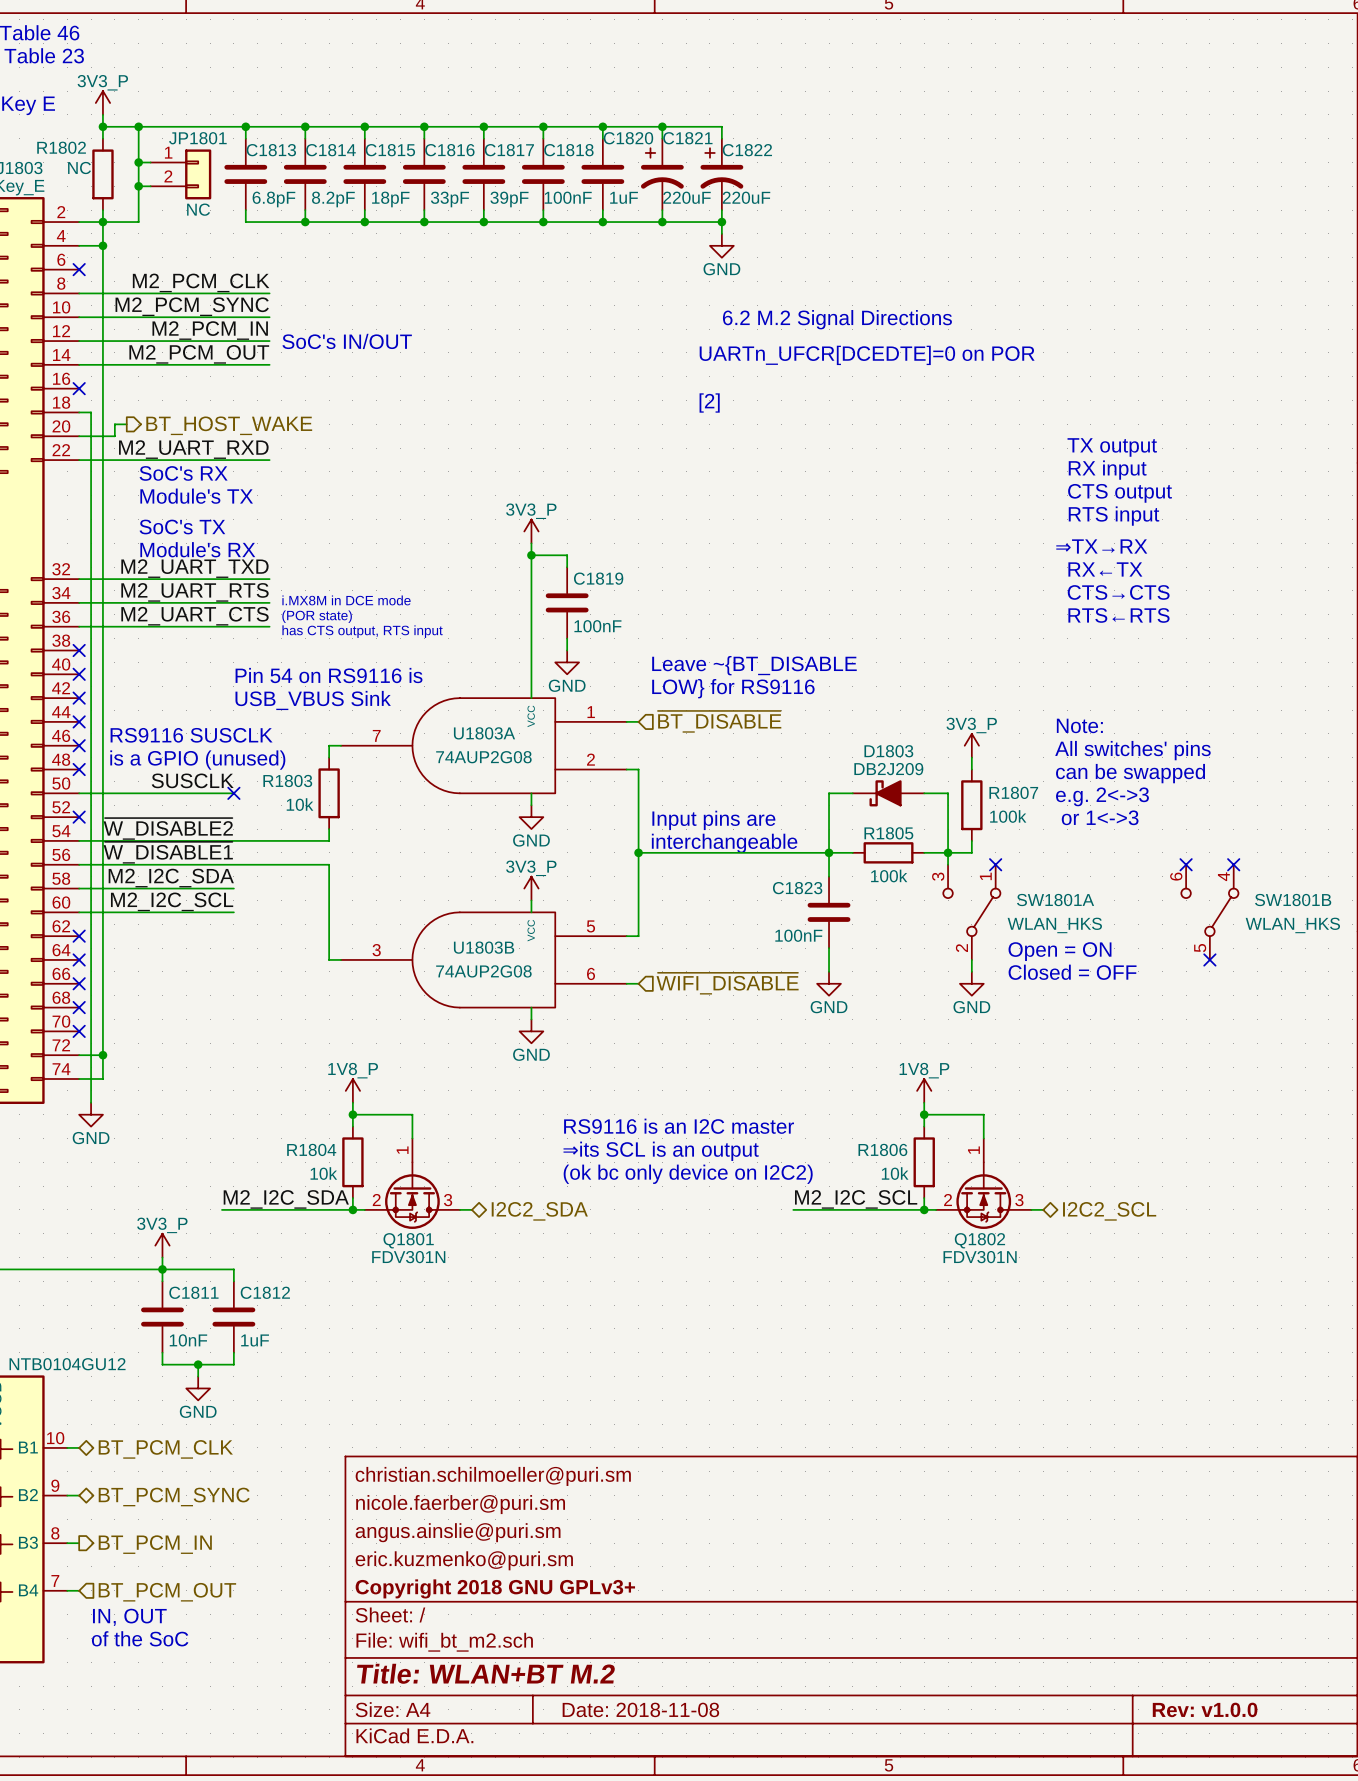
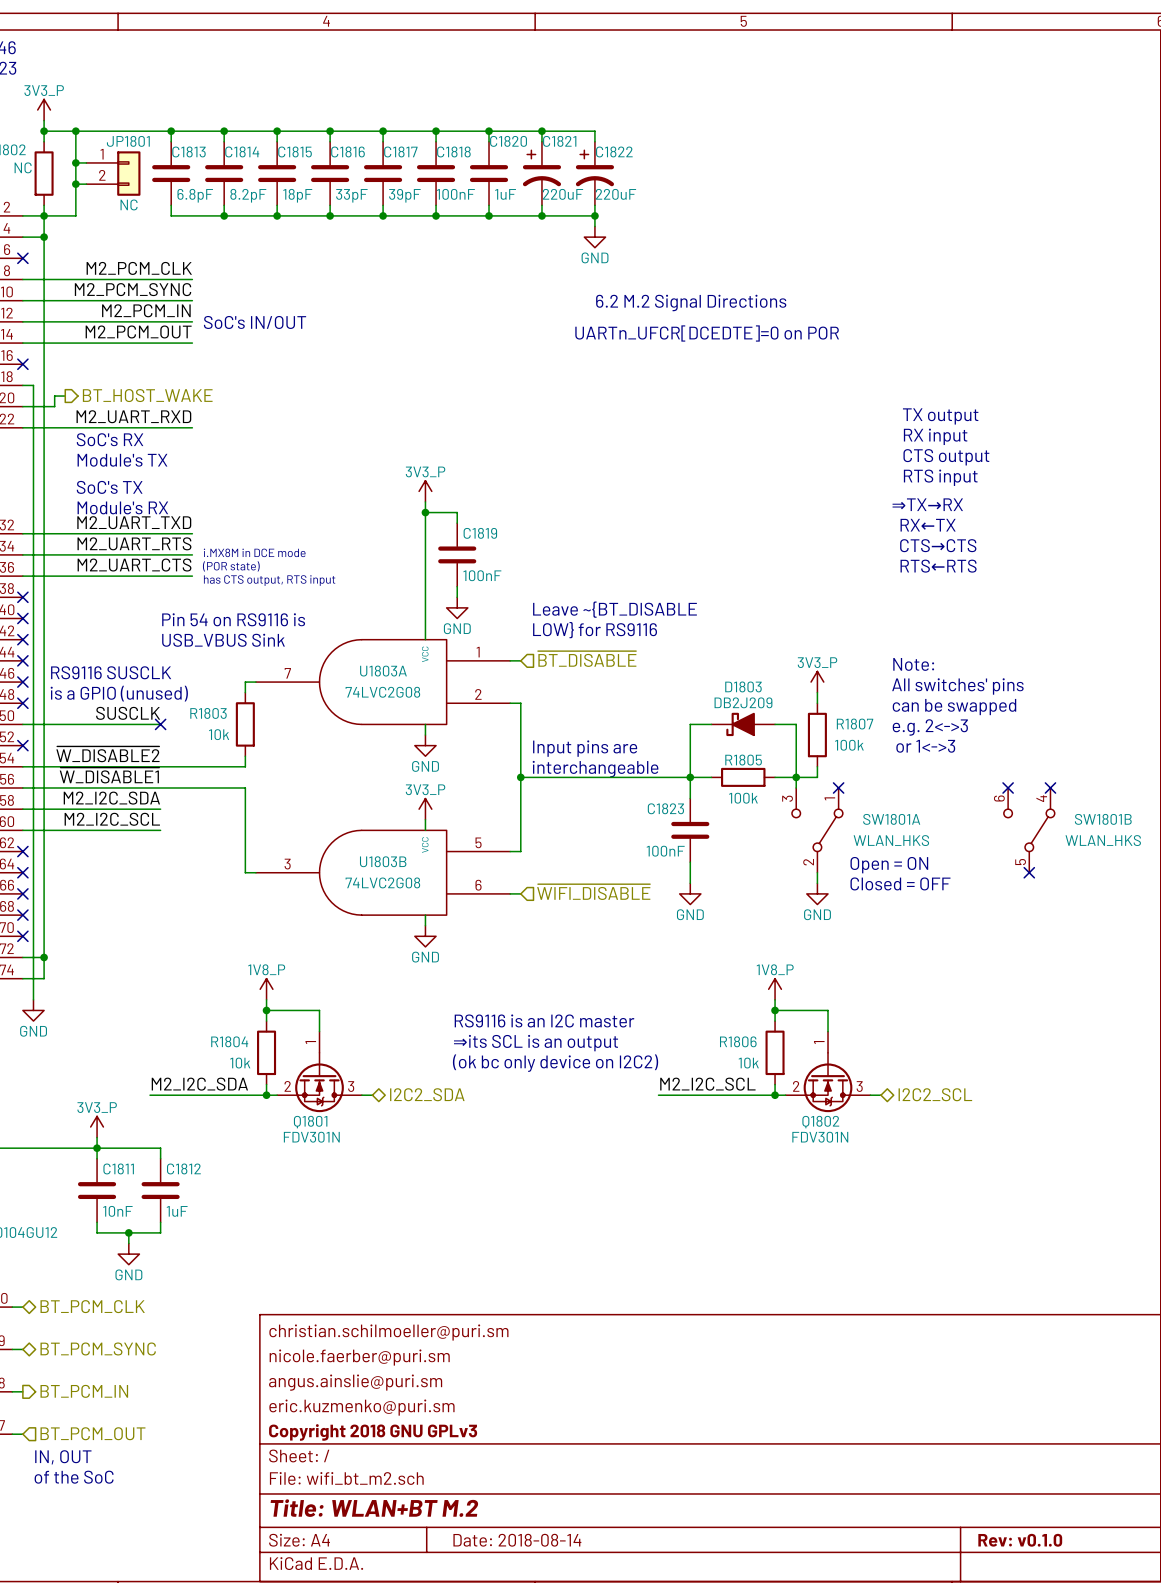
text: [2] (709, 403) -> none
U1803A value: 74AUP2G08 (483, 757) -> 74LVC2G08 (382, 692)
U1803B value: 74AUP2G08 (483, 971) -> 74LVC2G08 (382, 882)
title block: Copyright 2018 GNU GPLv3+ (495, 1588) -> Copyright 2018 GNU GPLv3 (373, 1432)
title block: Date: 2018-11-08 (640, 1709) -> Date: 2018-08-14 (517, 1540)
title block: Rev: v1.0.0 (1205, 1709) -> Rev: v0.1.0 (1020, 1540)

